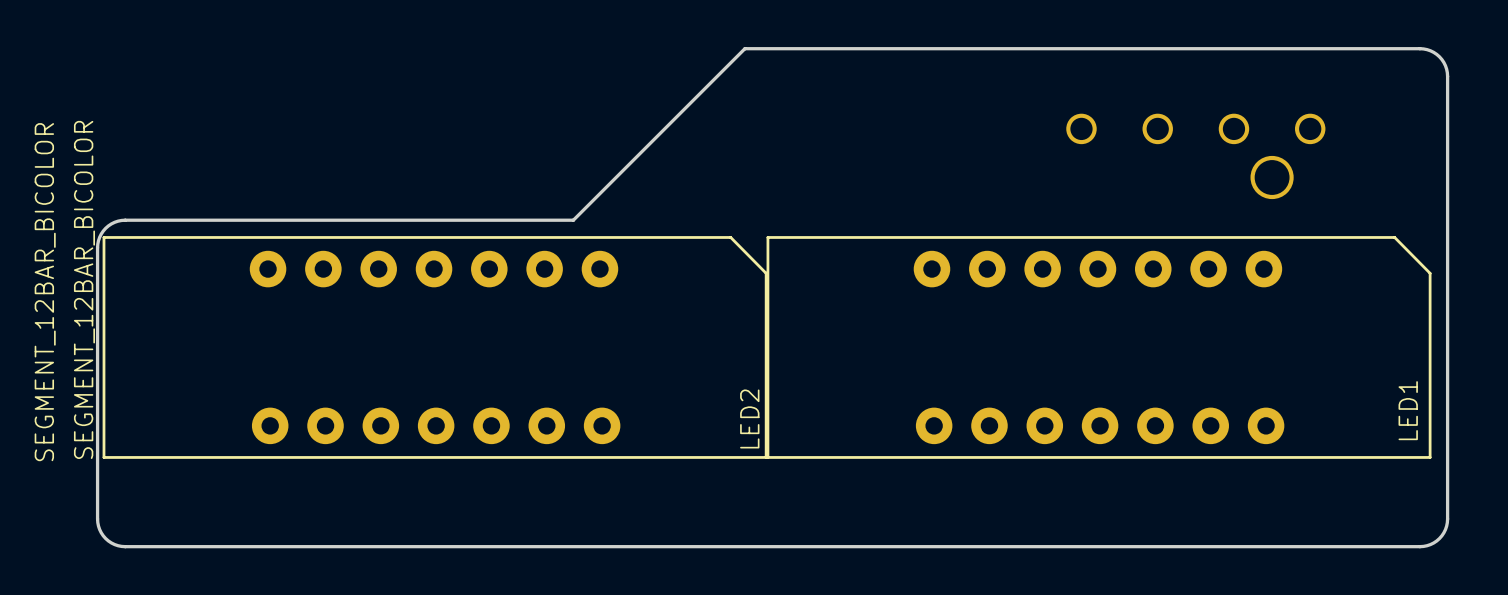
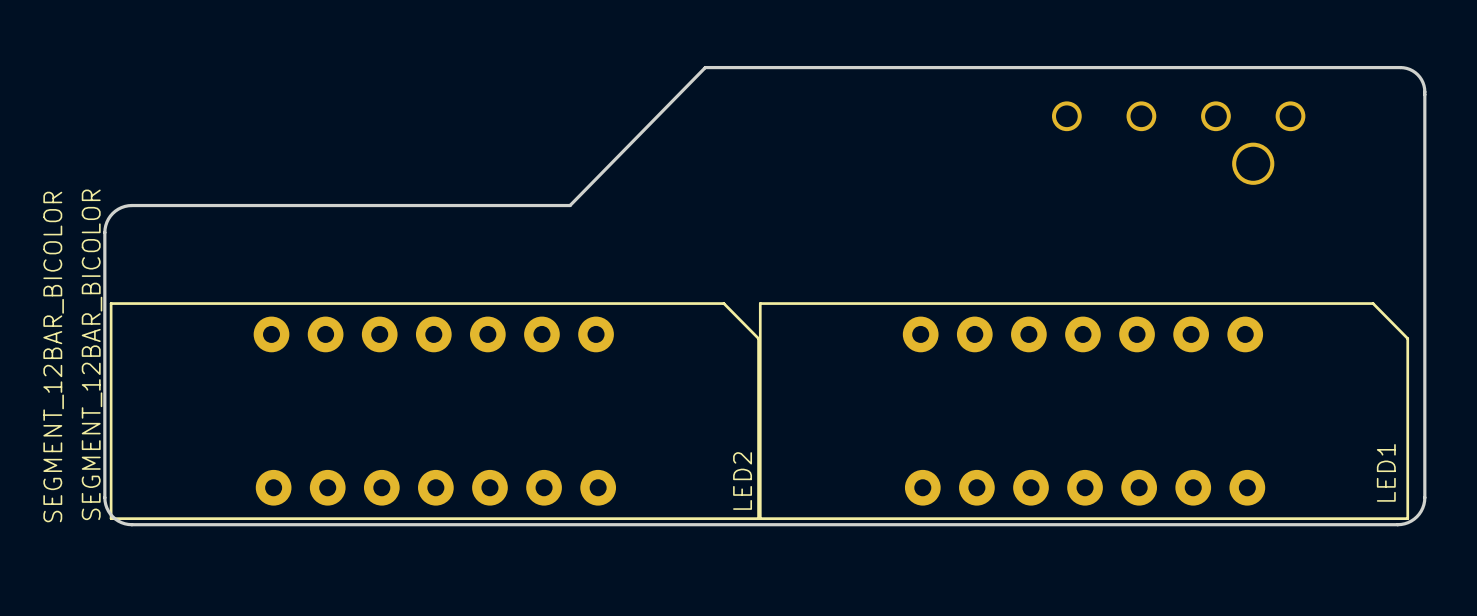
board edge: (1447, 104) (1447, 76) (1445, 65) (1436, 54) (1423, 48) (744, 48) (573, 220) -> (1424, 91) (1422, 82) (1417, 74) (1409, 69) (1400, 67) (705, 67) (570, 205)
LED2 position: (435, 347) -> (434, 411)
LED1 position: (1099, 347) -> (1084, 411)

